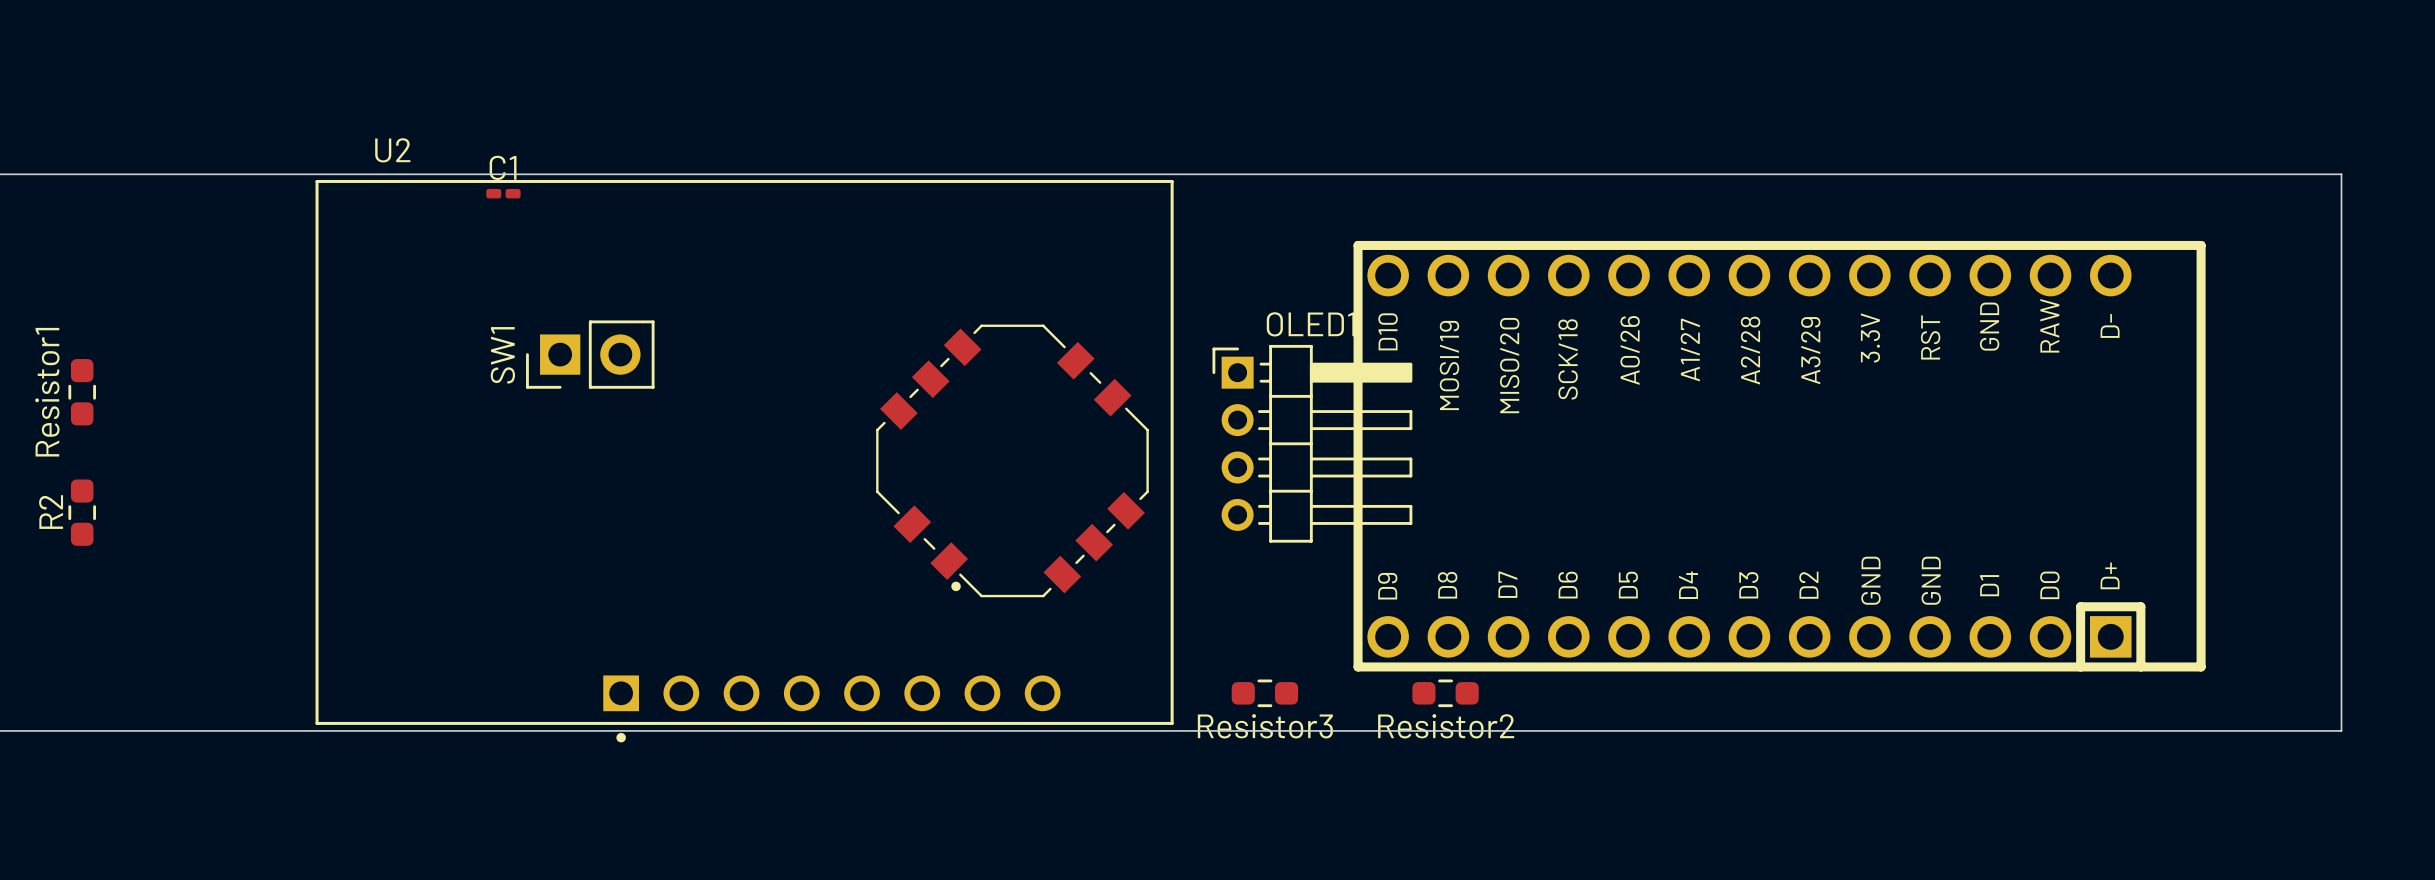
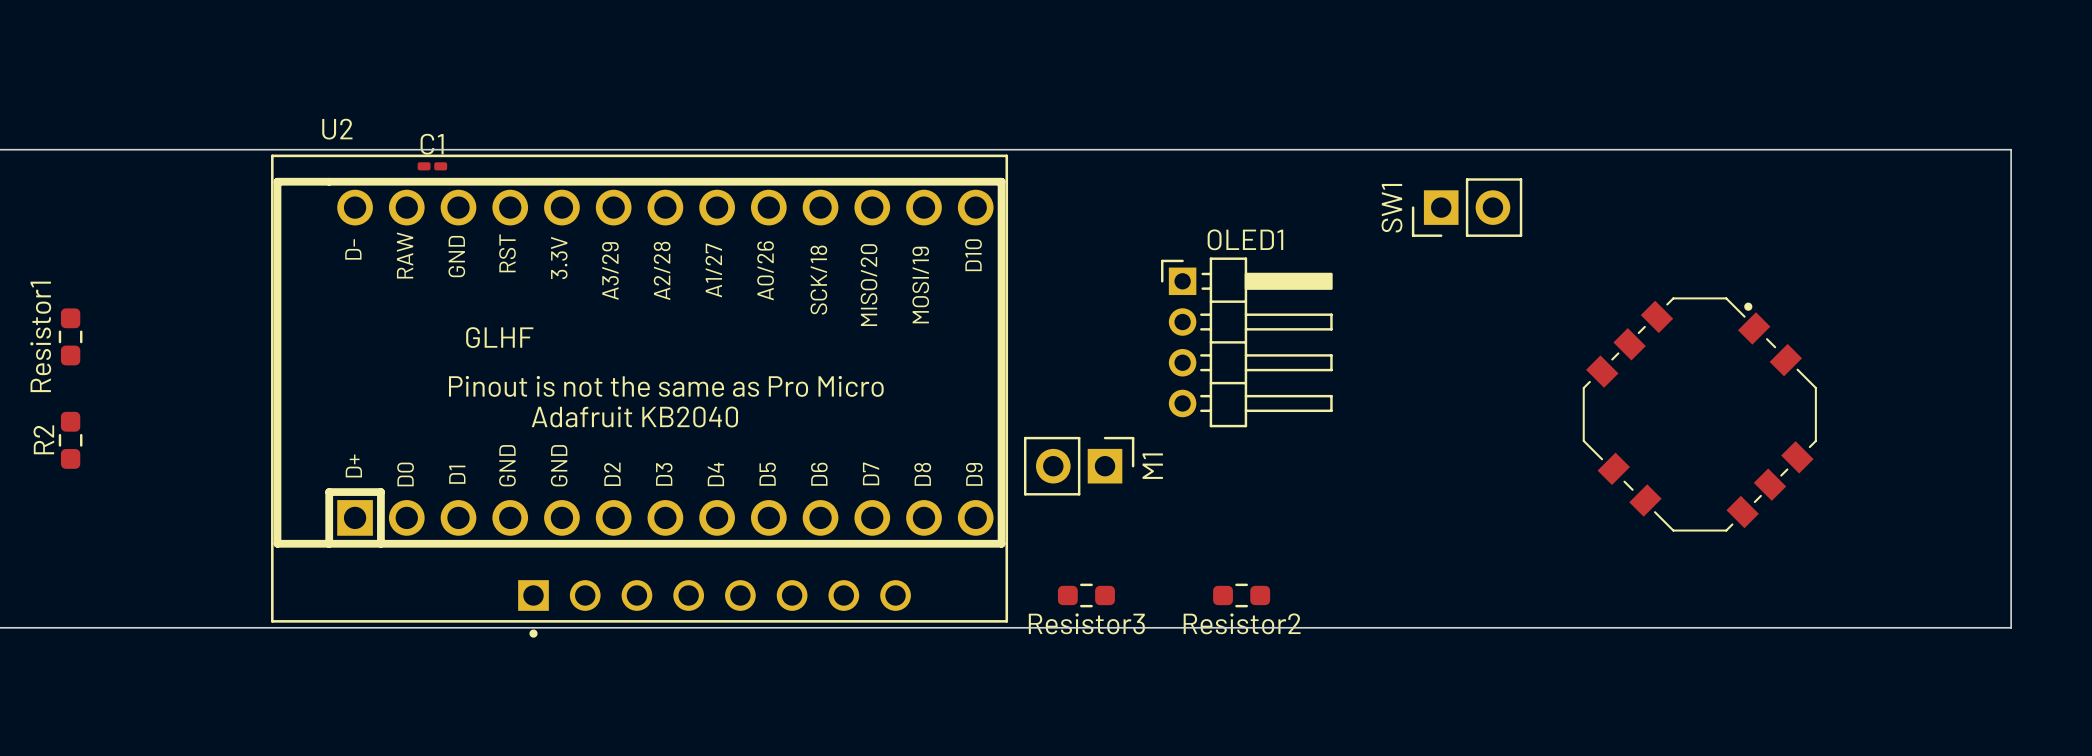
SW1 position: (590, 354) -> (1467, 207)
part: none -> (639, 362)
OLED1 position: (1312, 443) -> (1246, 342)
part: (1779, 456) -> none
part: (1012, 460) -> none
part: none -> (1699, 414)
M1: none -> (1079, 466)

